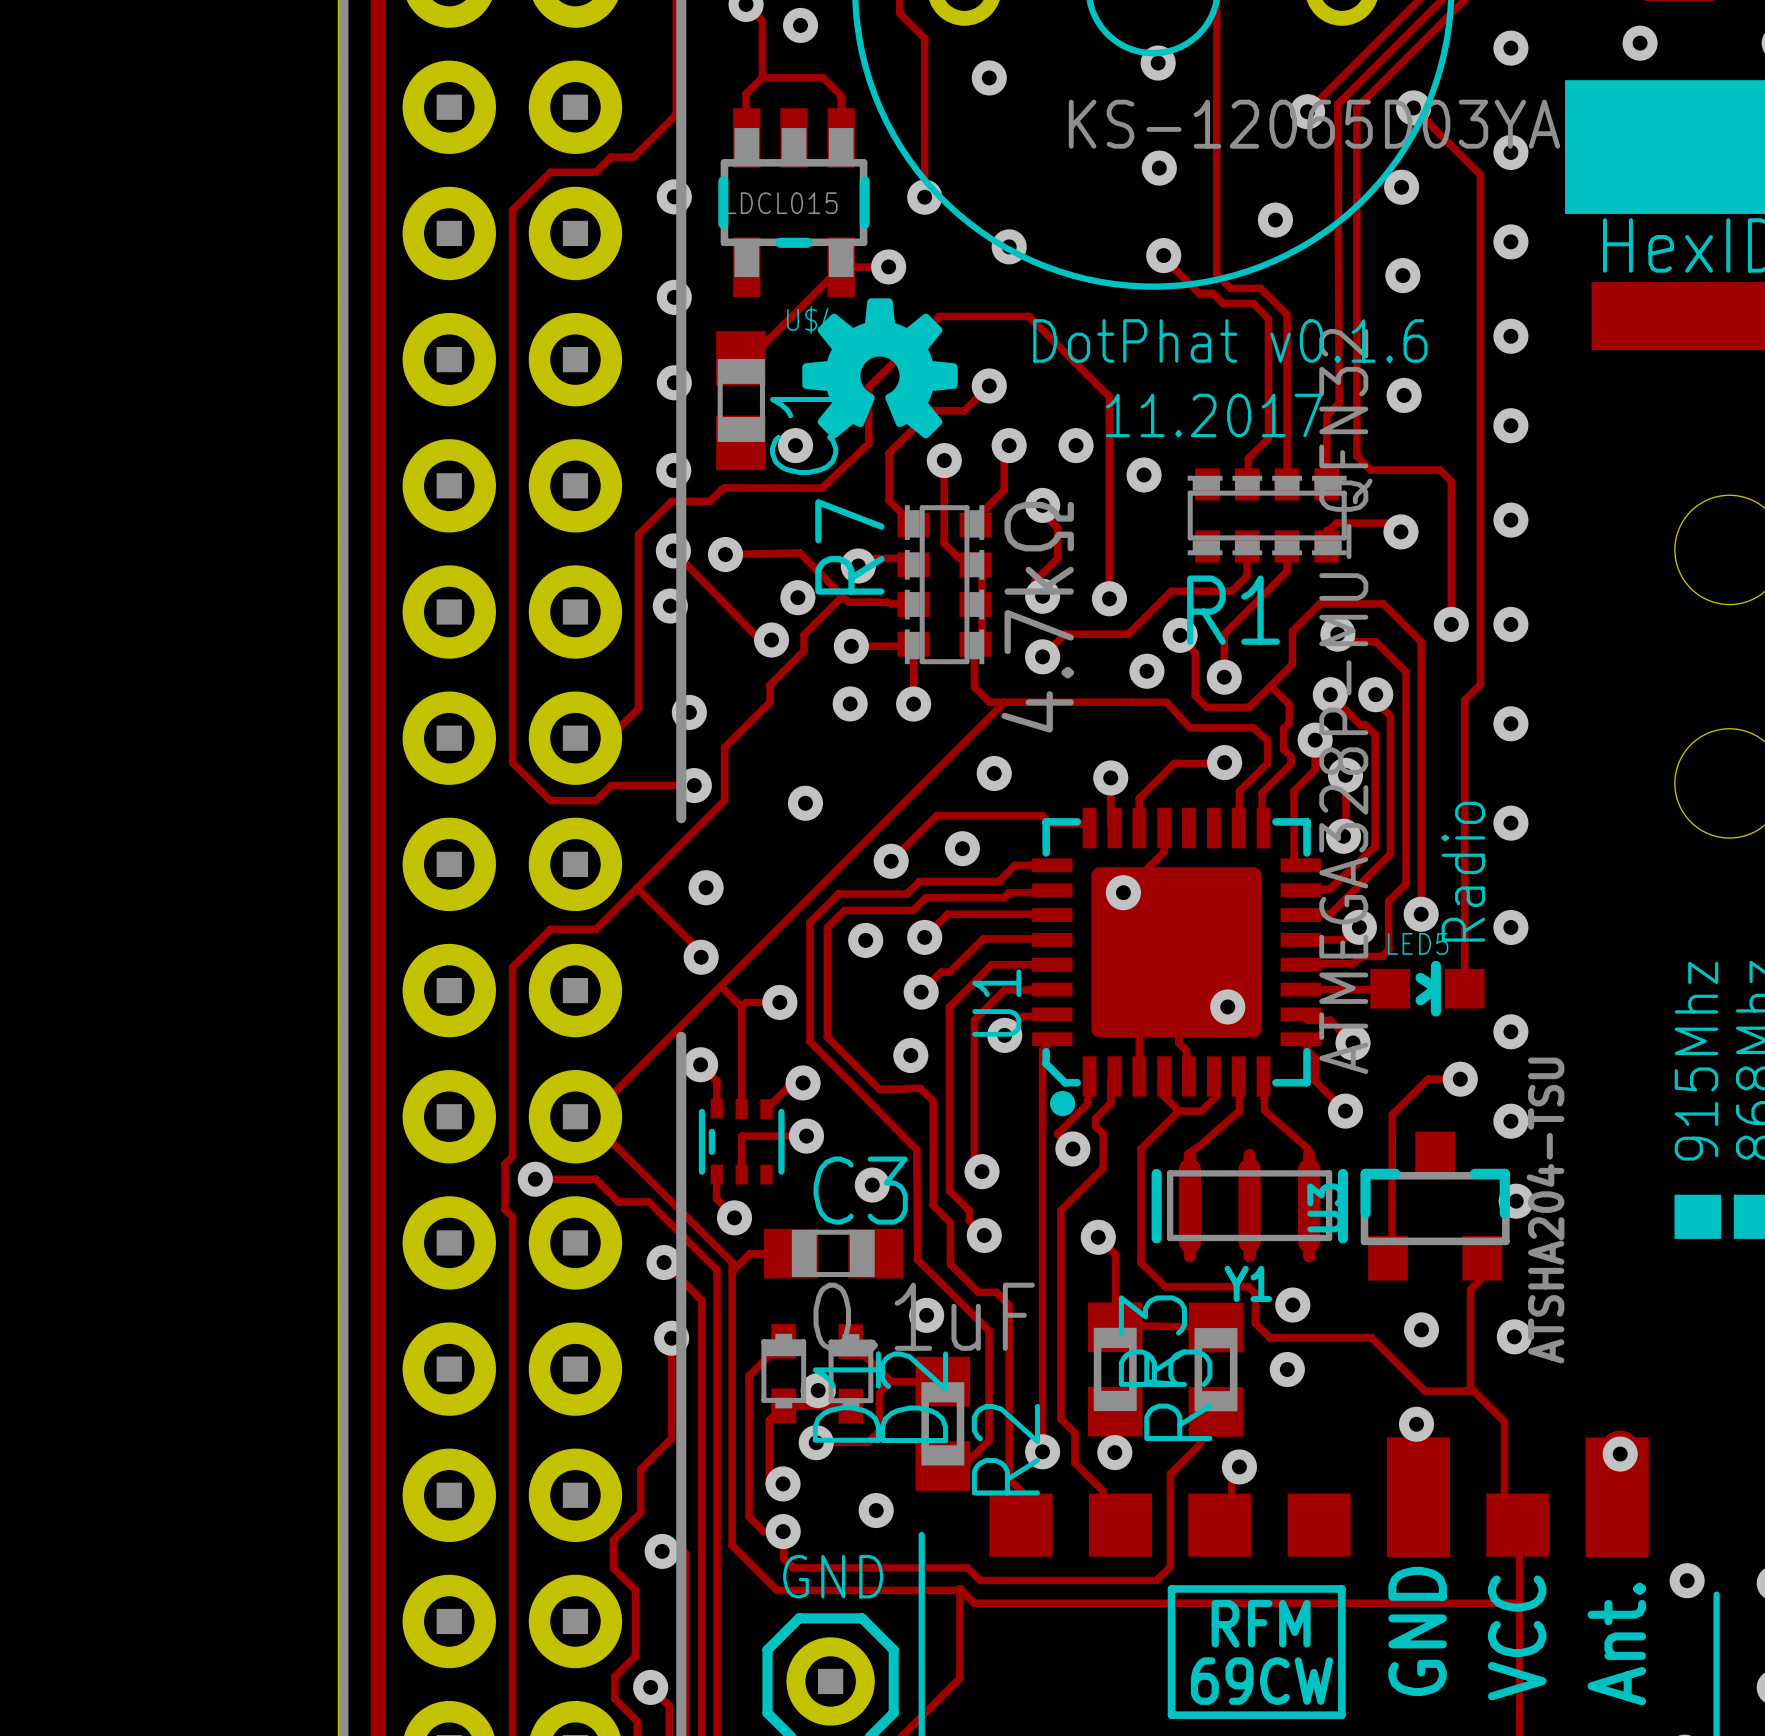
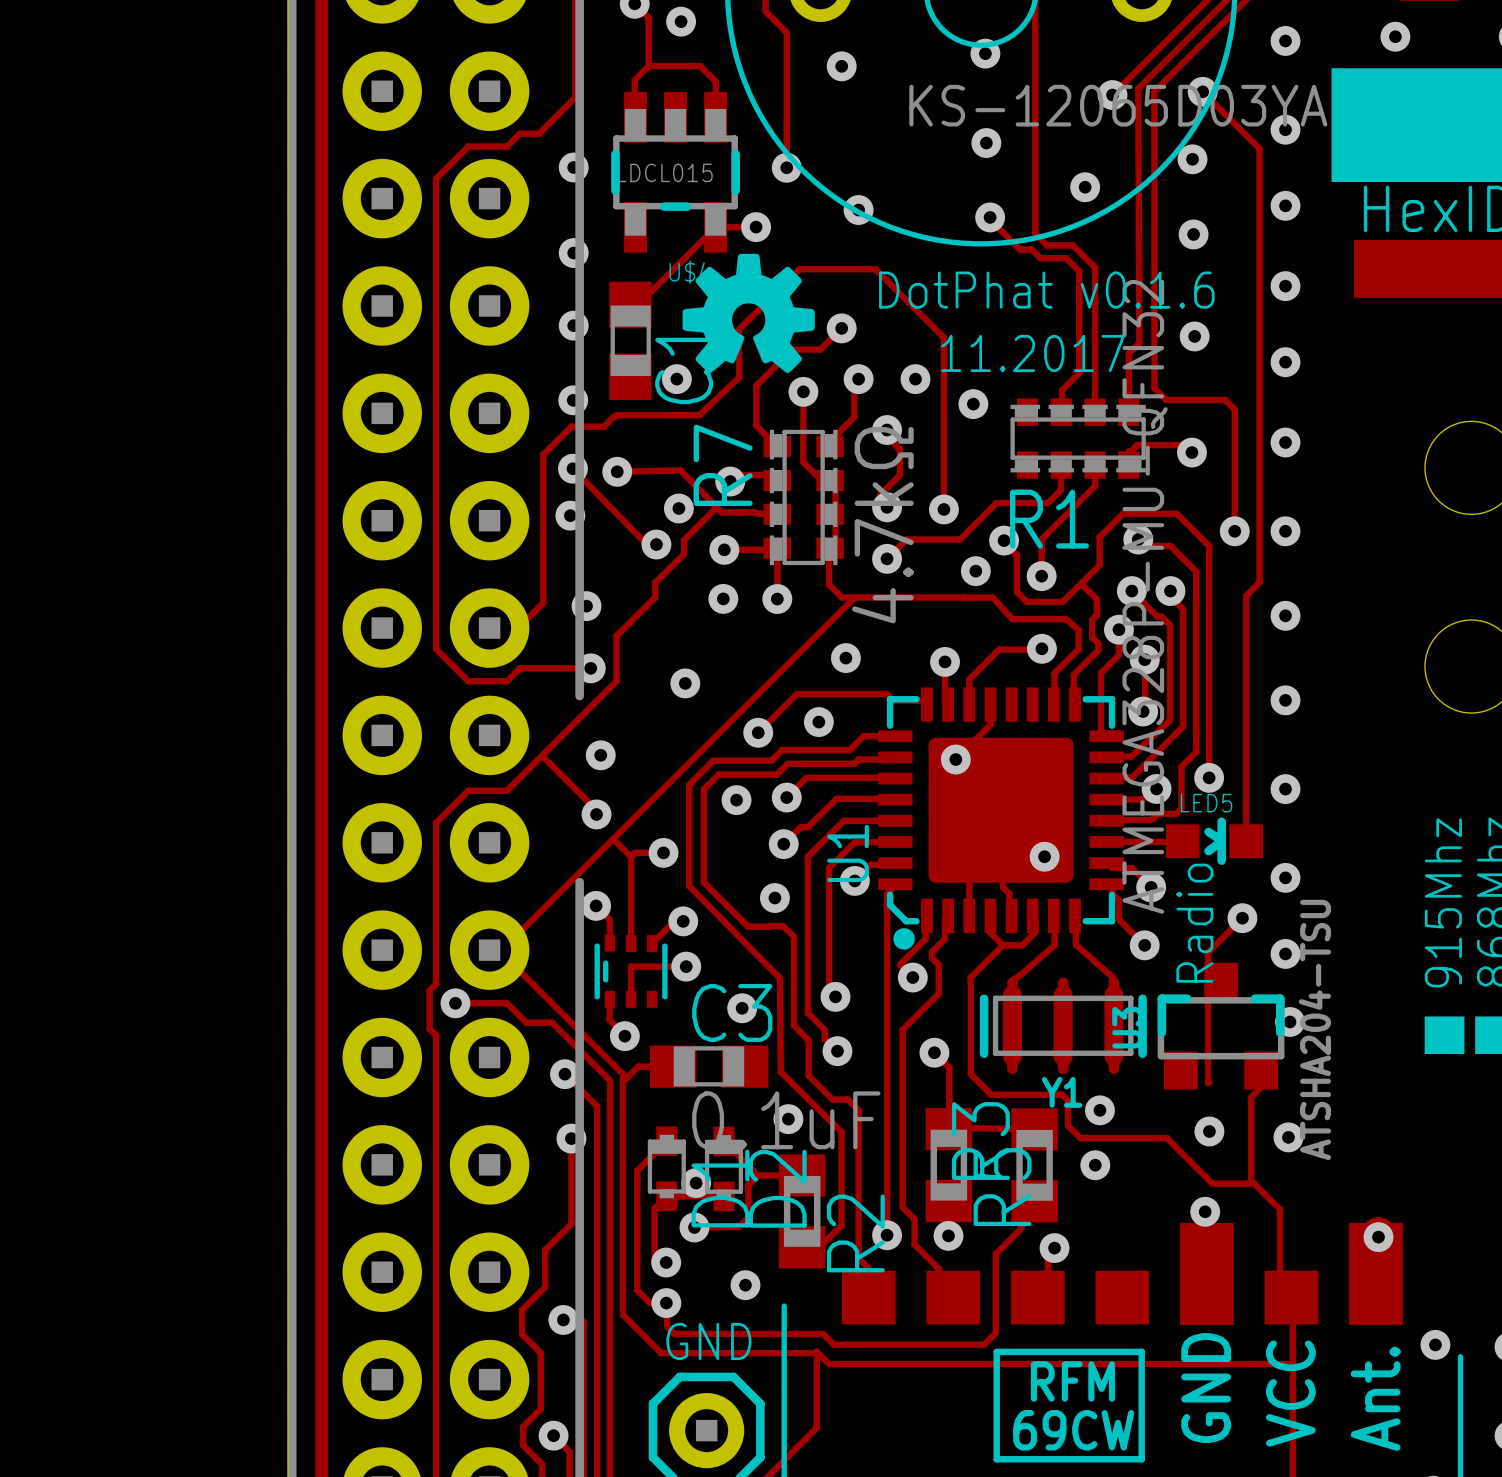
text position: Radio (1463, 871) -> Radio (1194, 923)
track: (1460, 1079) (1428, 1079) (1392, 1115) (1392, 1264) (1387, 1258) -> (1242, 918) (1208, 952) (1209, 1082)

